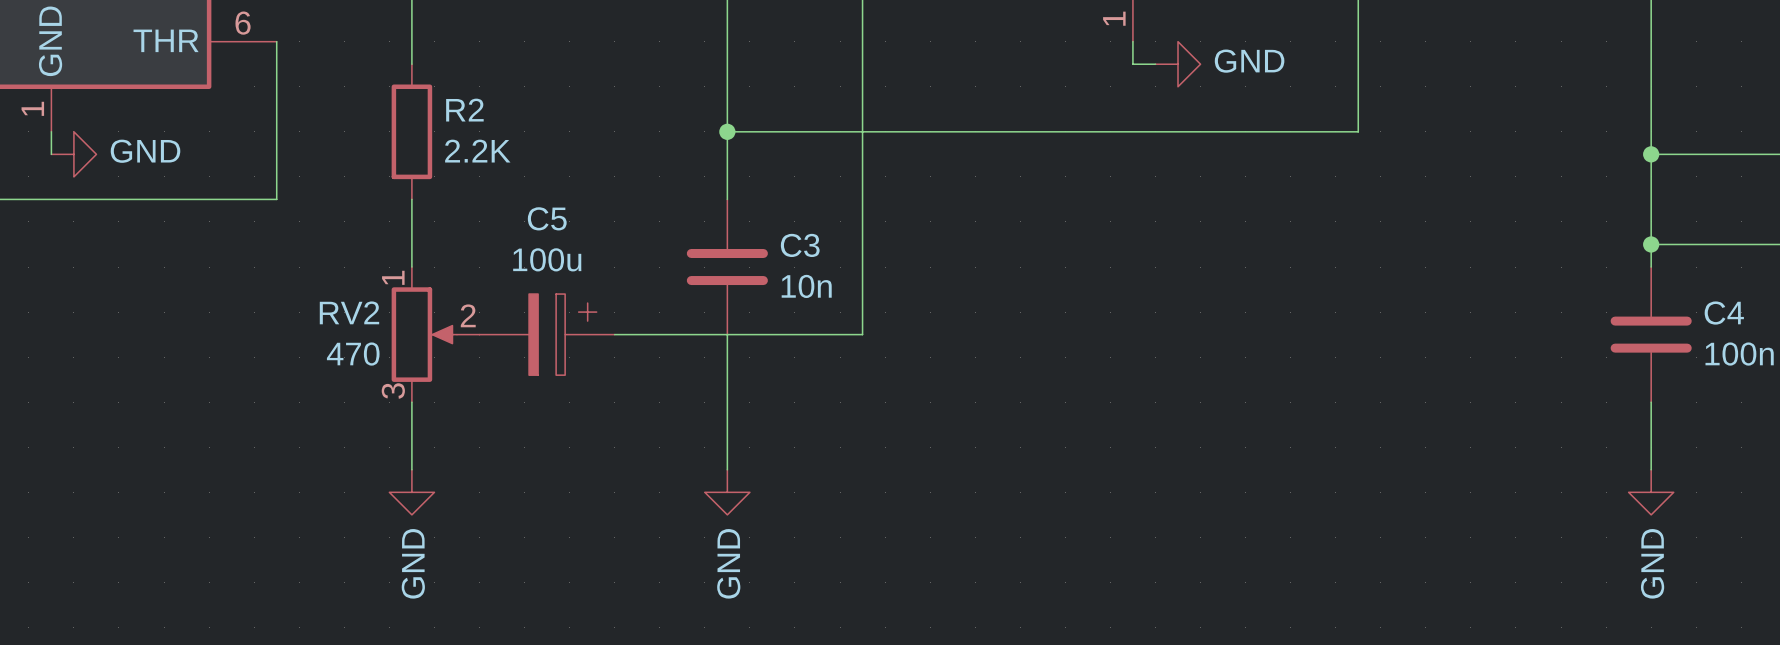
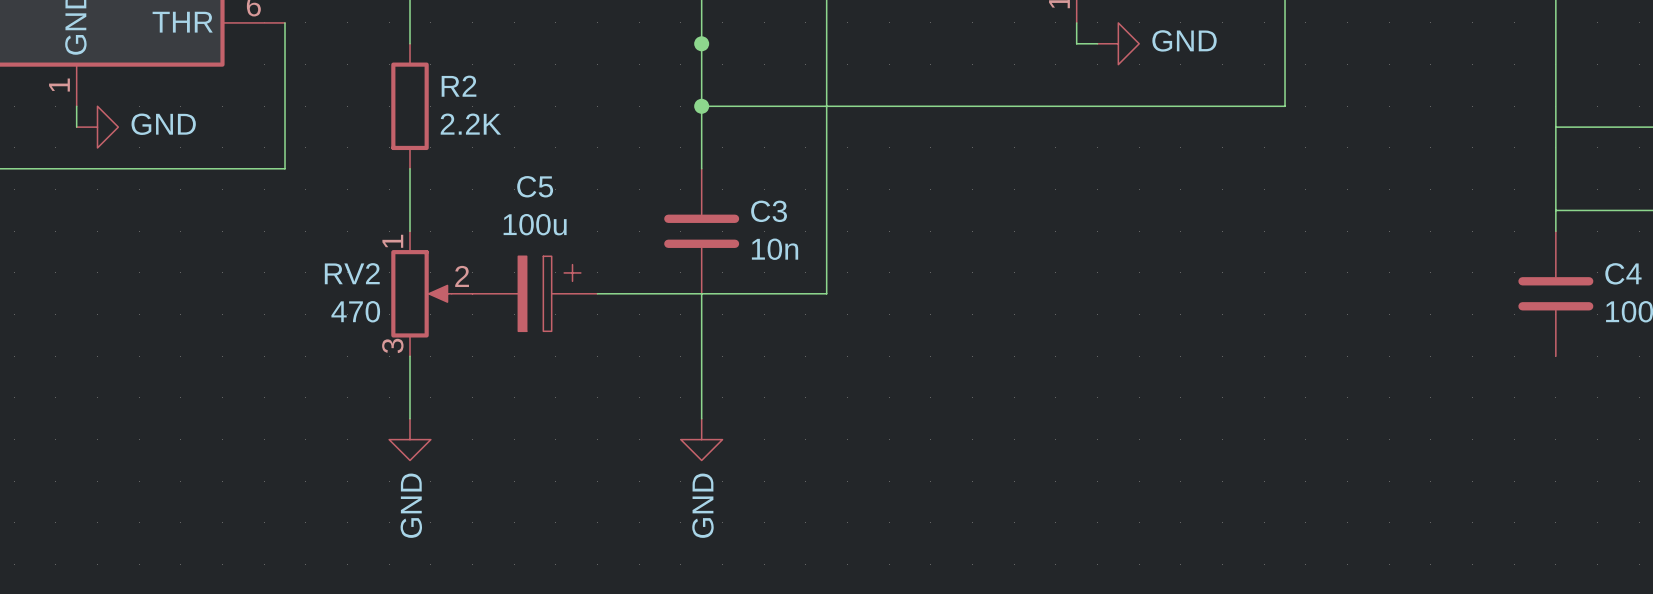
junction: none -> (701, 43)
junction: (1651, 154) -> none
junction: (1651, 244) -> none
wire: (1651, 402) (1651, 469) -> none
power symbol: GND (1651, 492) -> none

